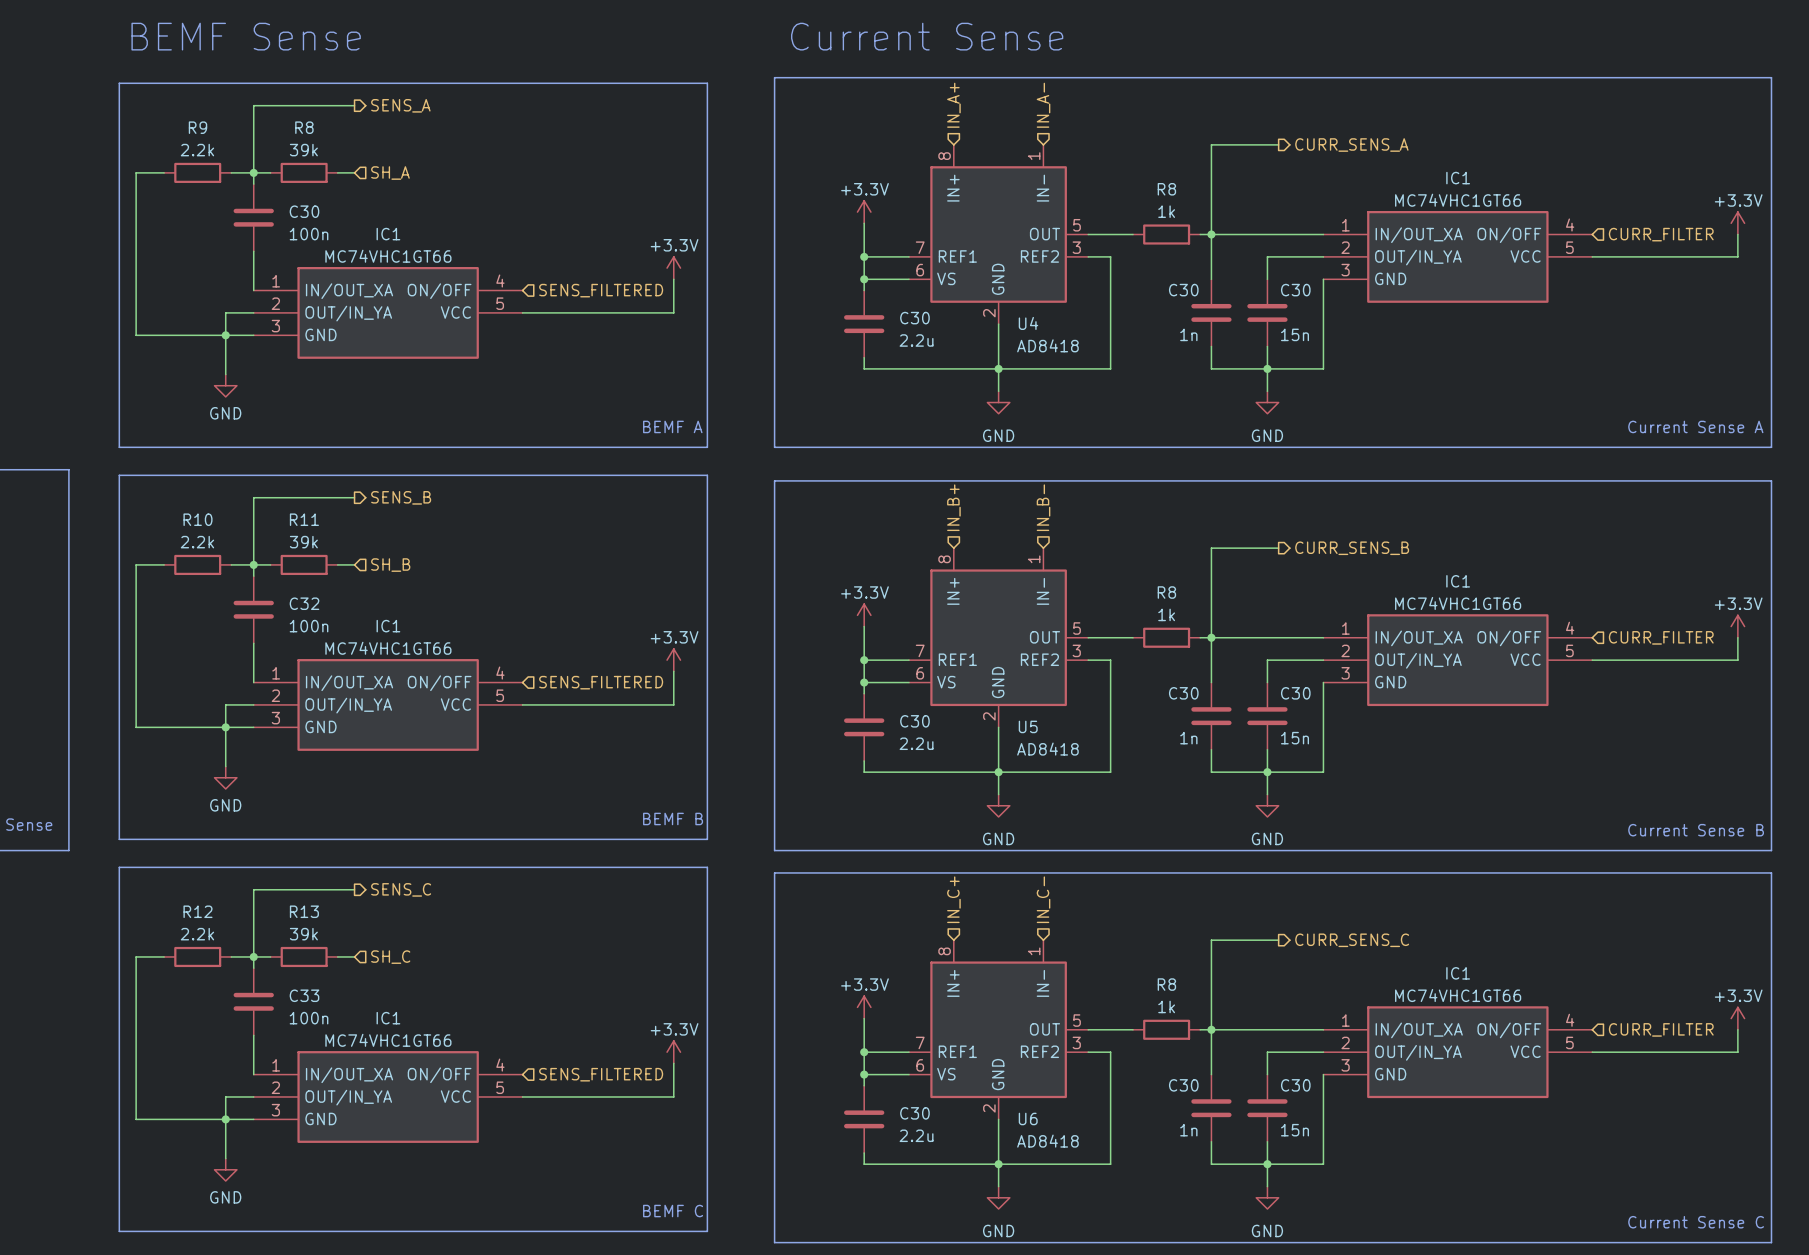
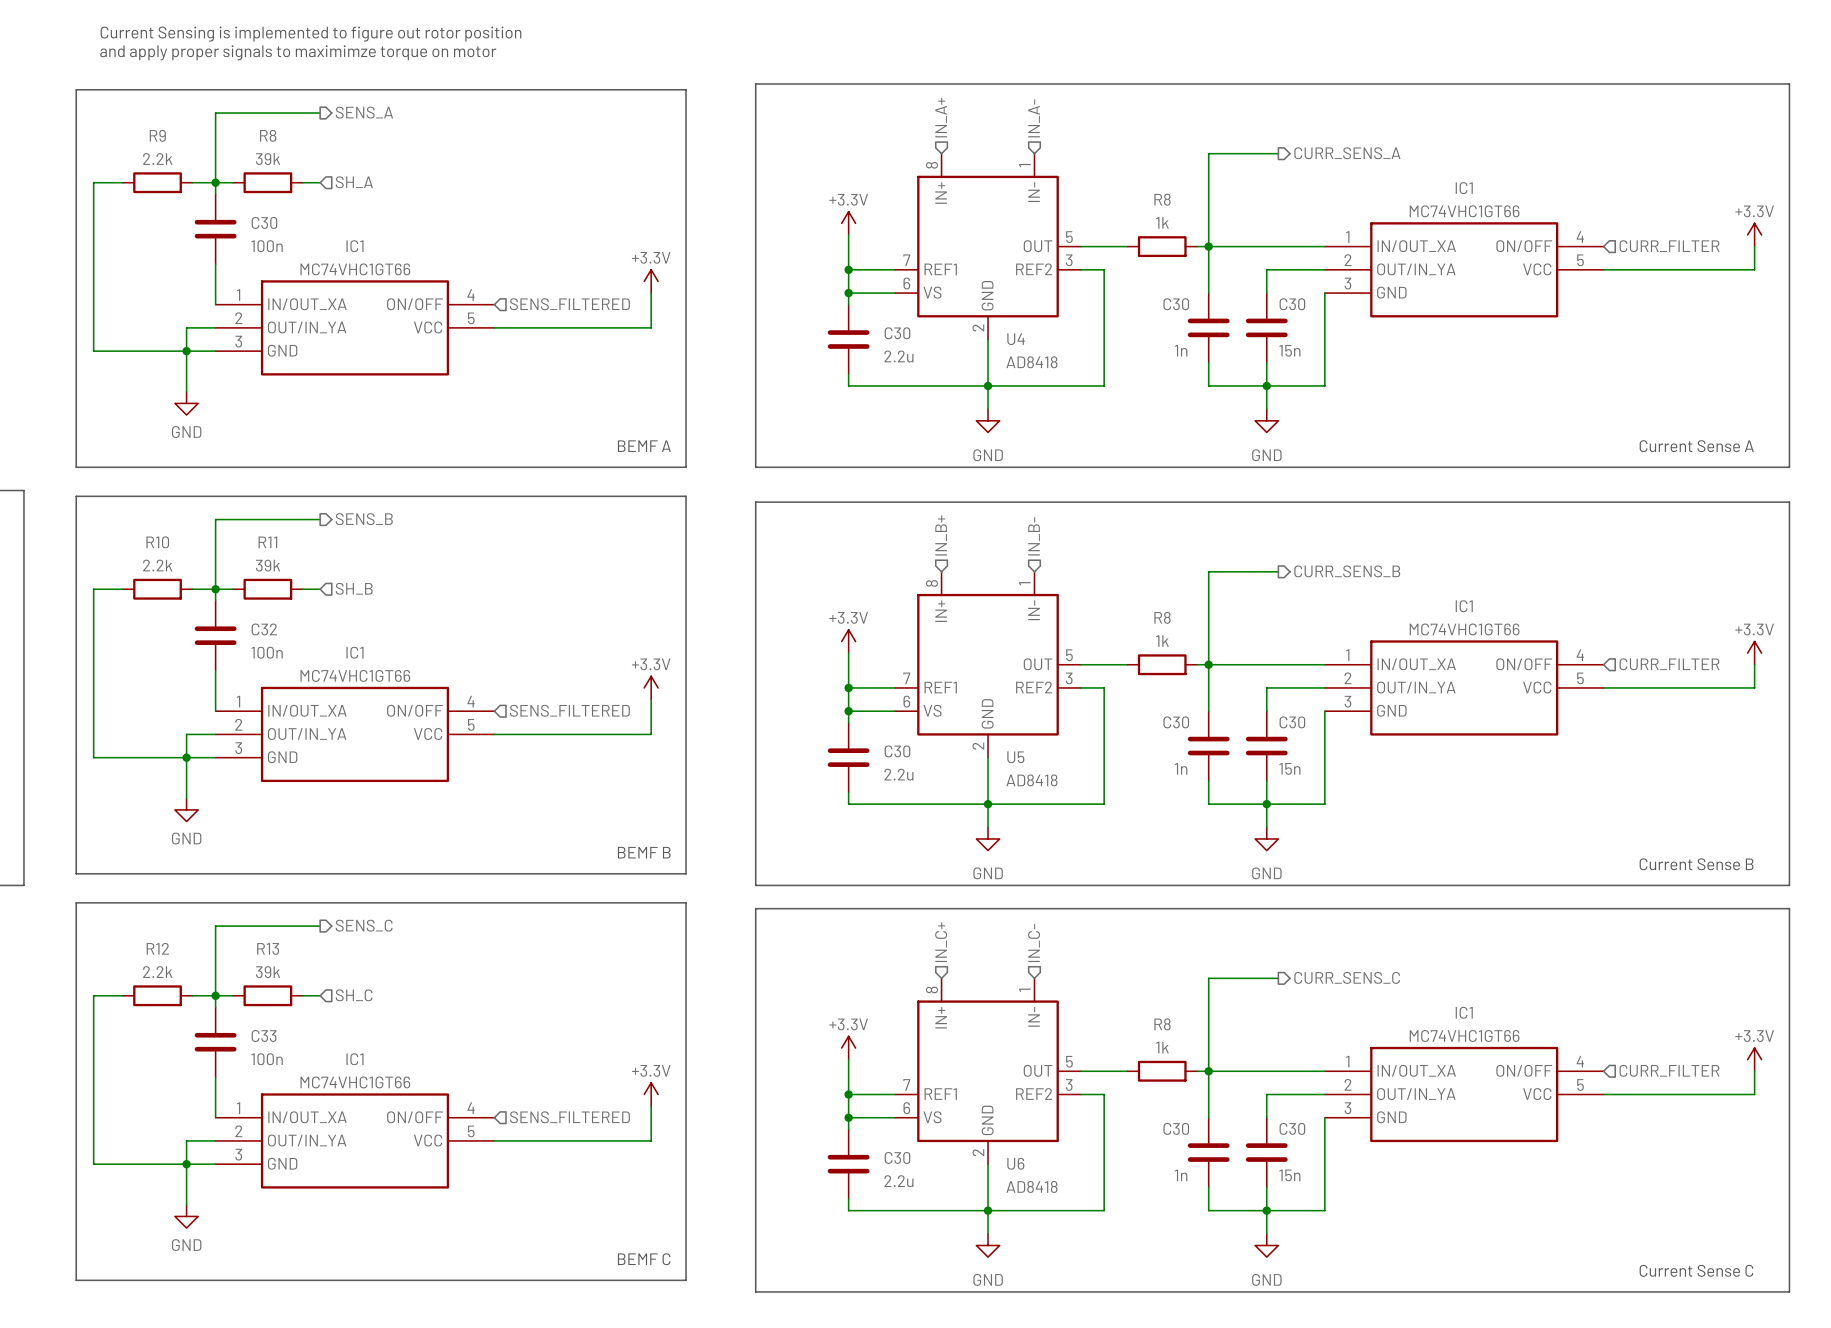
text: none -> Current Sensing is implemented to figure out rotor position (311, 34)
text: BEMF Sense (246, 36) -> none
text: Current Sense (927, 36) -> none
text: none -> and apply proper signals to maximimze torque on motor (298, 52)

